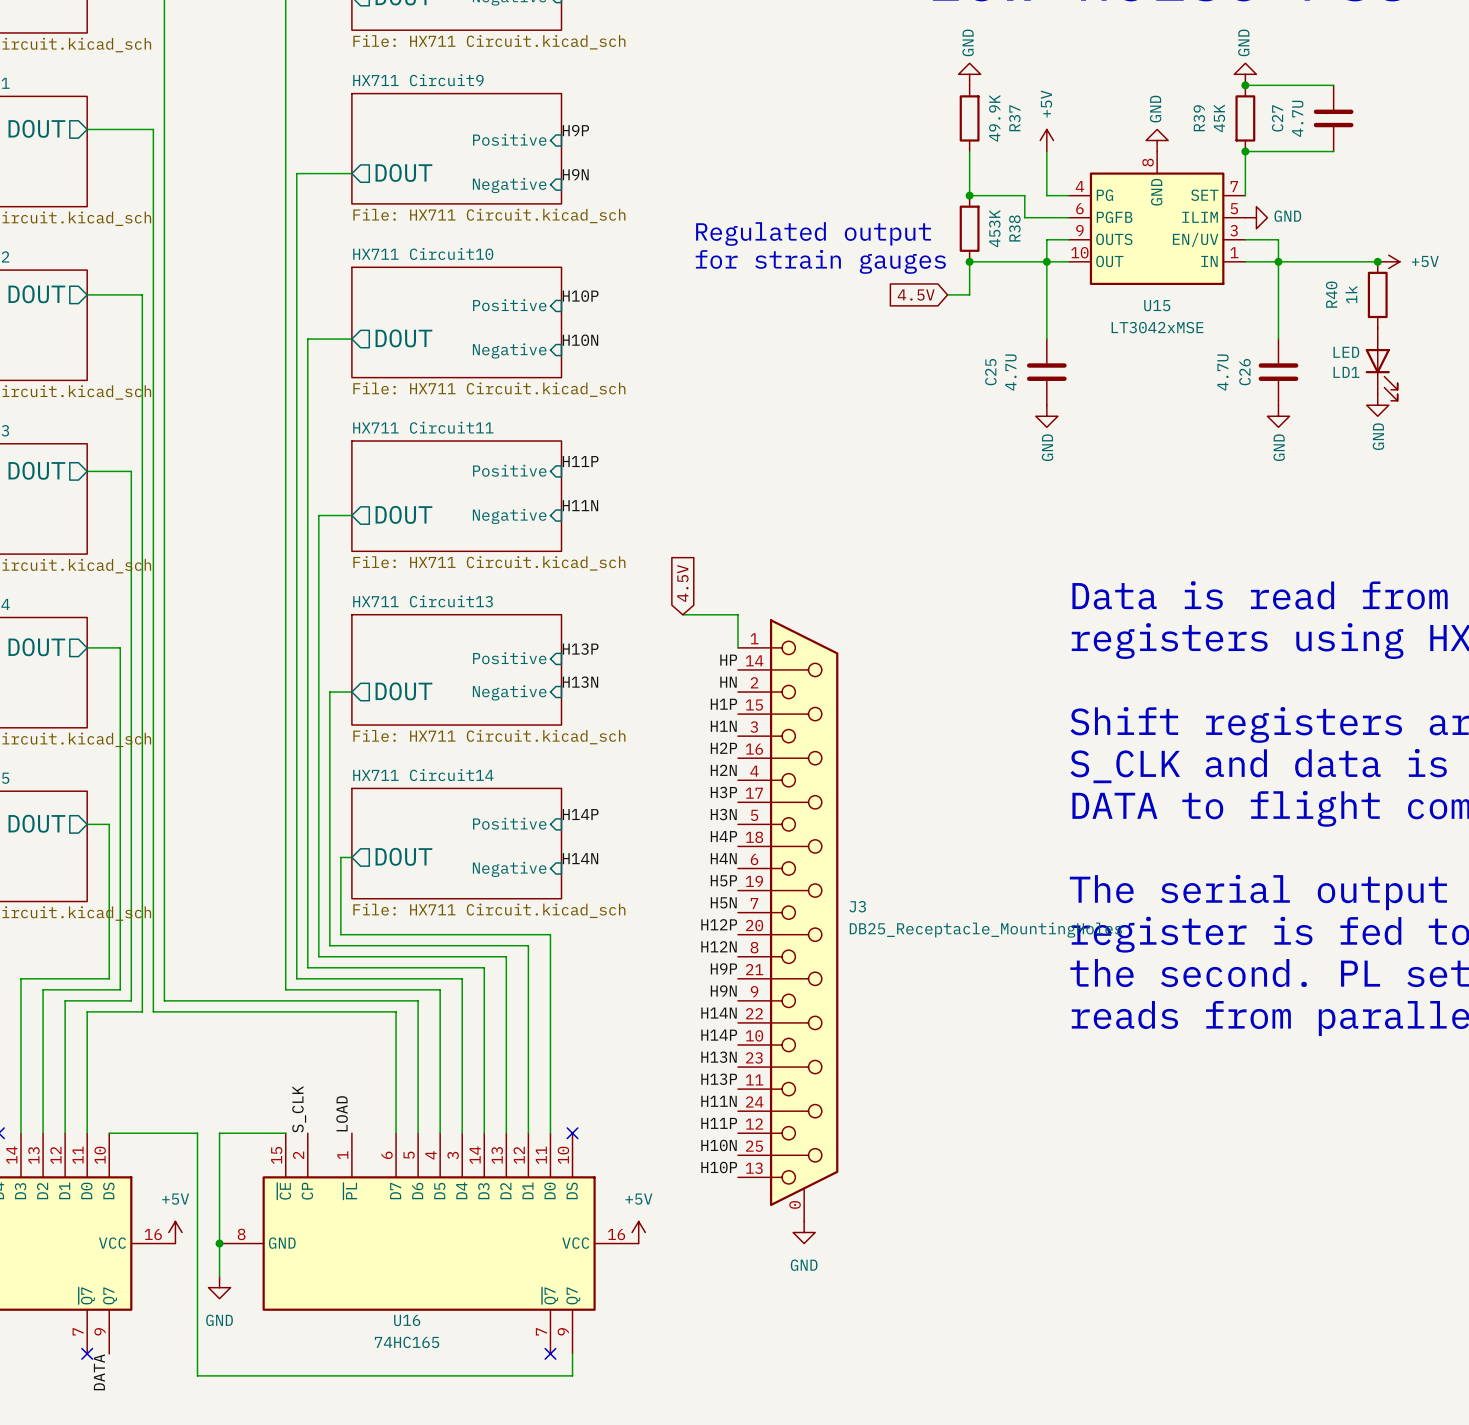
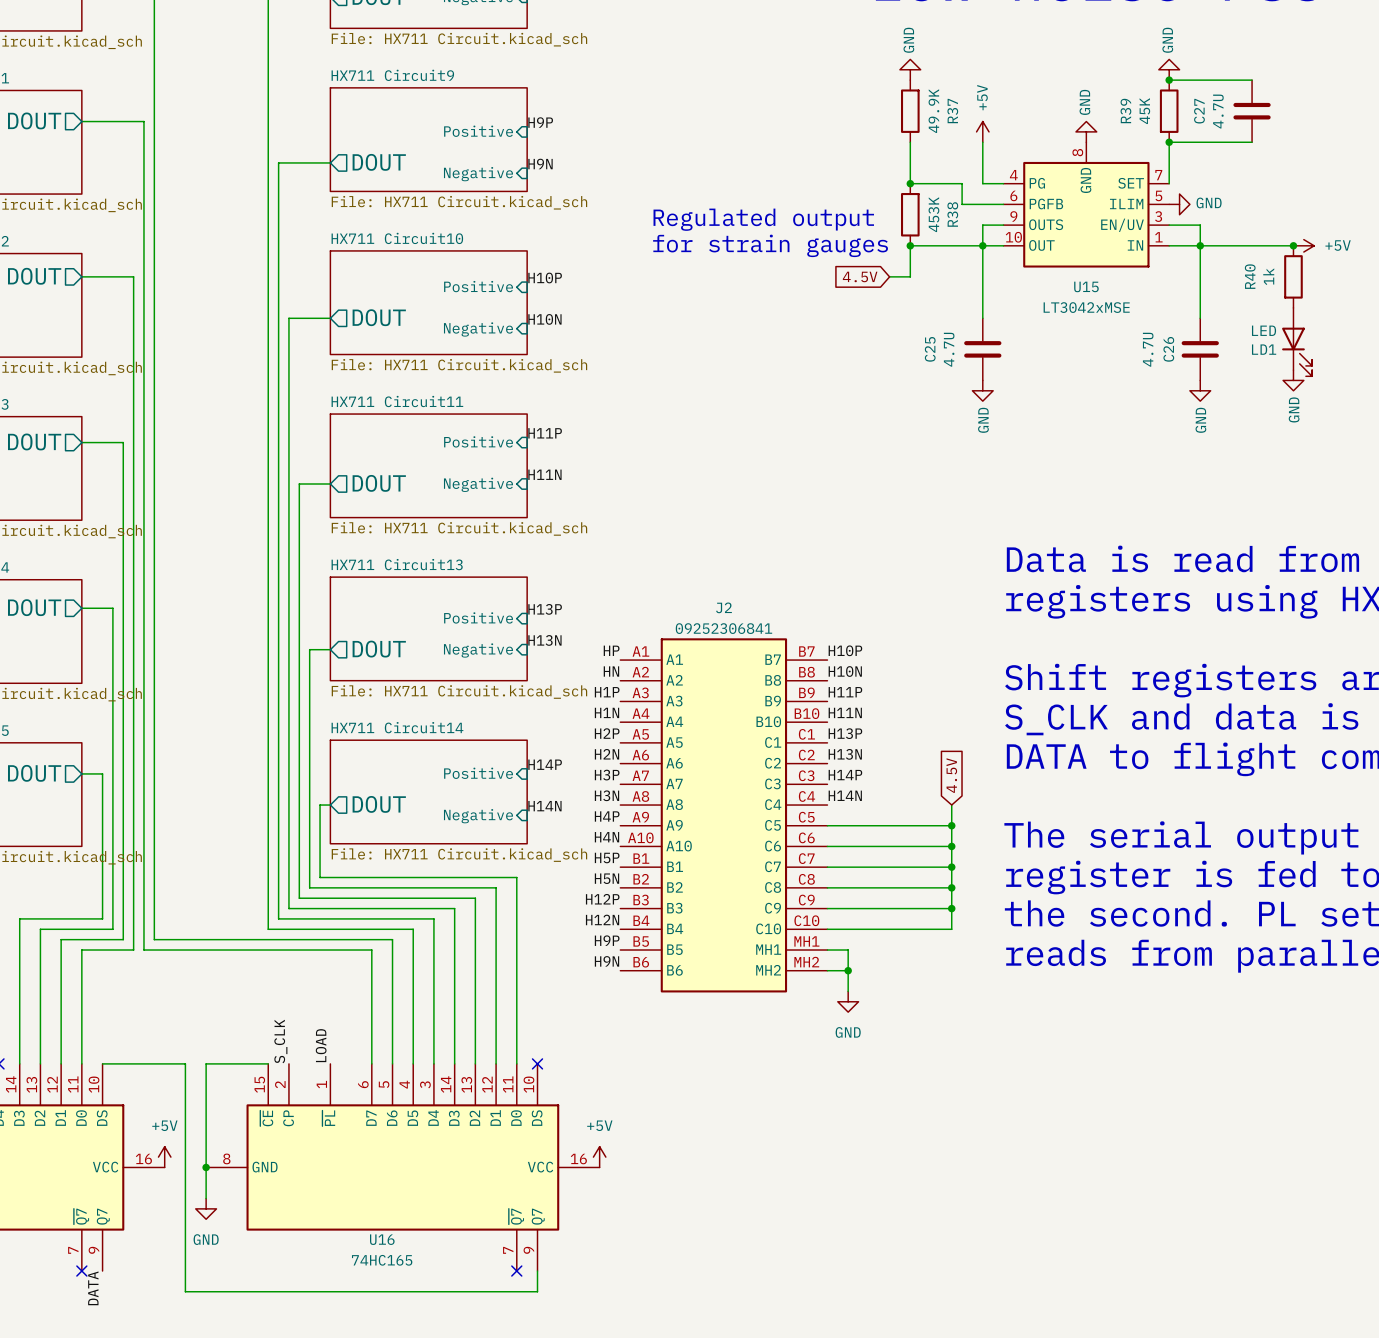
global label: 4.5V (682, 583) -> none
wire: (682, 614) (737, 614) (737, 647) -> none
label position: HP (728, 660) -> HP (611, 650)
label position: HN (728, 682) -> HN (611, 671)
label: none -> H10P (845, 650)
label position: H1P (723, 704) -> H1P (607, 692)
label: none -> H10N (845, 671)
label position: H1N (723, 726) -> H1N (606, 712)
label: none -> H11P (845, 692)
label position: H2P (723, 748) -> H2P (607, 733)
label: none -> H11N (845, 712)
label position: H2N (723, 770) -> H2N (606, 754)
label: none -> H13P (845, 733)
label position: H3P (723, 792) -> H3P (607, 775)
label: none -> H13N (845, 754)
label position: H3N (723, 814) -> H3N (606, 795)
label: none -> H14P (845, 775)
global label: none -> 4.5V (951, 775)
label position: H4P (723, 836) -> H4P (607, 816)
label: none -> H14N (845, 795)
wire: none -> (951, 805) (951, 929) (827, 929)
label position: H4N (723, 858) -> H4N (606, 837)
J2: none -> 09252306841 (723, 815)
wire: none -> (827, 825) (951, 825)
junction: none -> (951, 825)
label position: H5P (723, 880) -> H5P (607, 858)
wire: none -> (827, 846) (951, 846)
junction: none -> (951, 846)
label position: H5N (723, 902) -> H5N (606, 878)
J3: DB25_Receptacle_MountingHoles (788, 920) -> none
wire: none -> (827, 867) (951, 867)
junction: none -> (951, 867)
label position: H12P (719, 924) -> H12P (602, 899)
wire: none -> (827, 887) (951, 887)
junction: none -> (951, 887)
label position: H12N (719, 946) -> H12N (602, 919)
wire: none -> (827, 908) (951, 908)
junction: none -> (951, 908)
label position: H9P (723, 968) -> H9P (607, 940)
label position: H9N (723, 990) -> H9N (606, 961)
wire: none -> (827, 950) (848, 950) (848, 991)
label: H14N (719, 1013) -> none
wire: none -> (827, 970) (848, 970)
junction: none -> (848, 970)
label: H14P (719, 1035) -> none
label: H13N (719, 1057) -> none
label: H13P (719, 1079) -> none
label: H11N (719, 1101) -> none
label: H11P (719, 1123) -> none
label: H10N (719, 1145) -> none
label: H10P (719, 1167) -> none
power symbol position: GND (804, 1232) -> GND (848, 1001)

